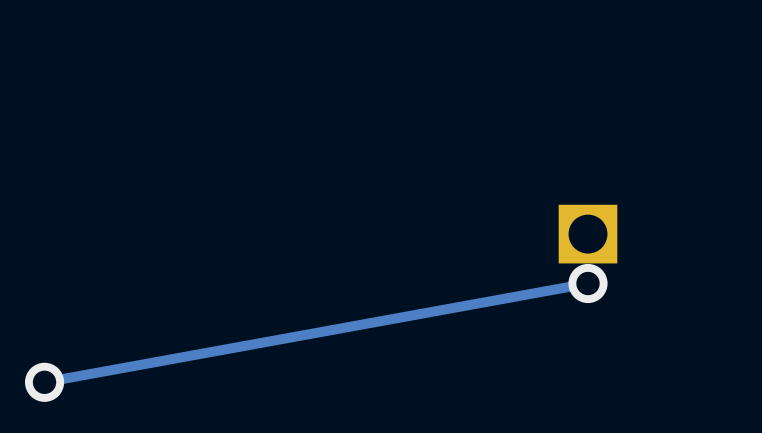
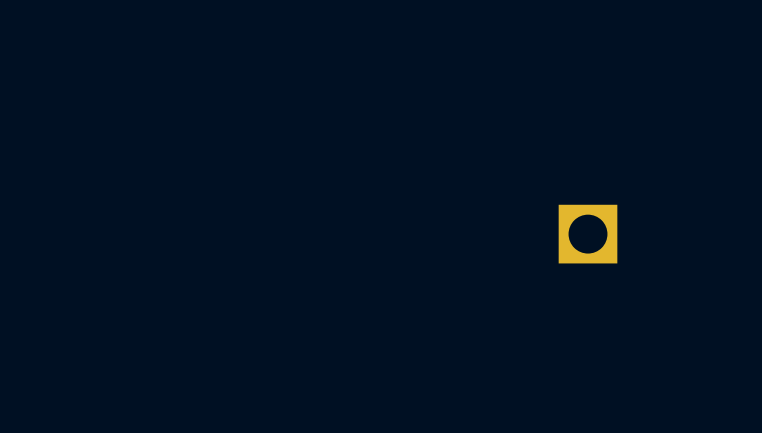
track: (588, 283) (44, 382) -> none
via: (588, 283) -> none
via: (44, 382) -> none

